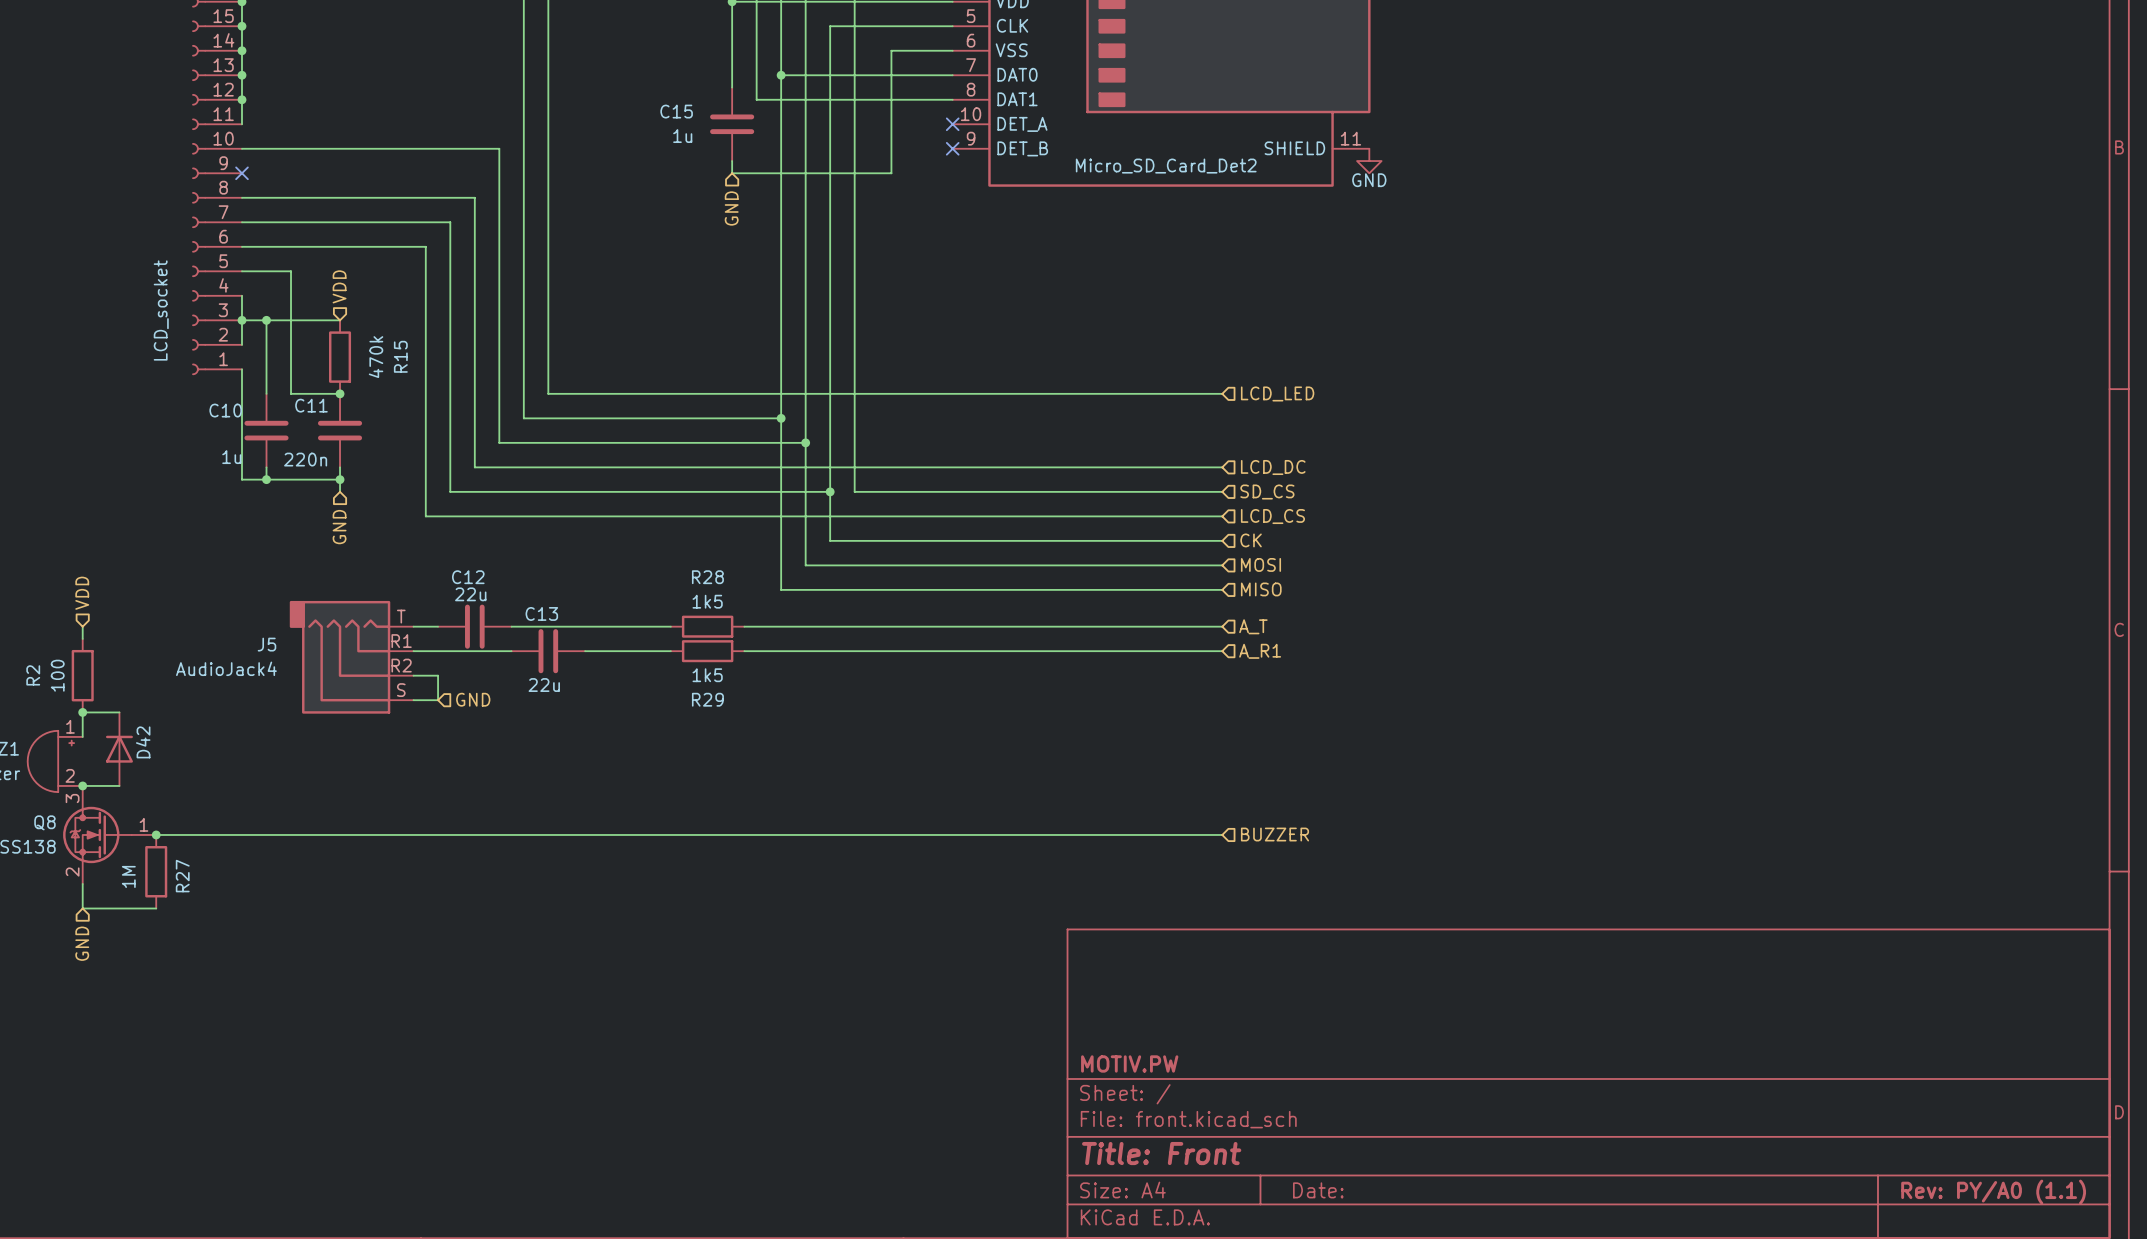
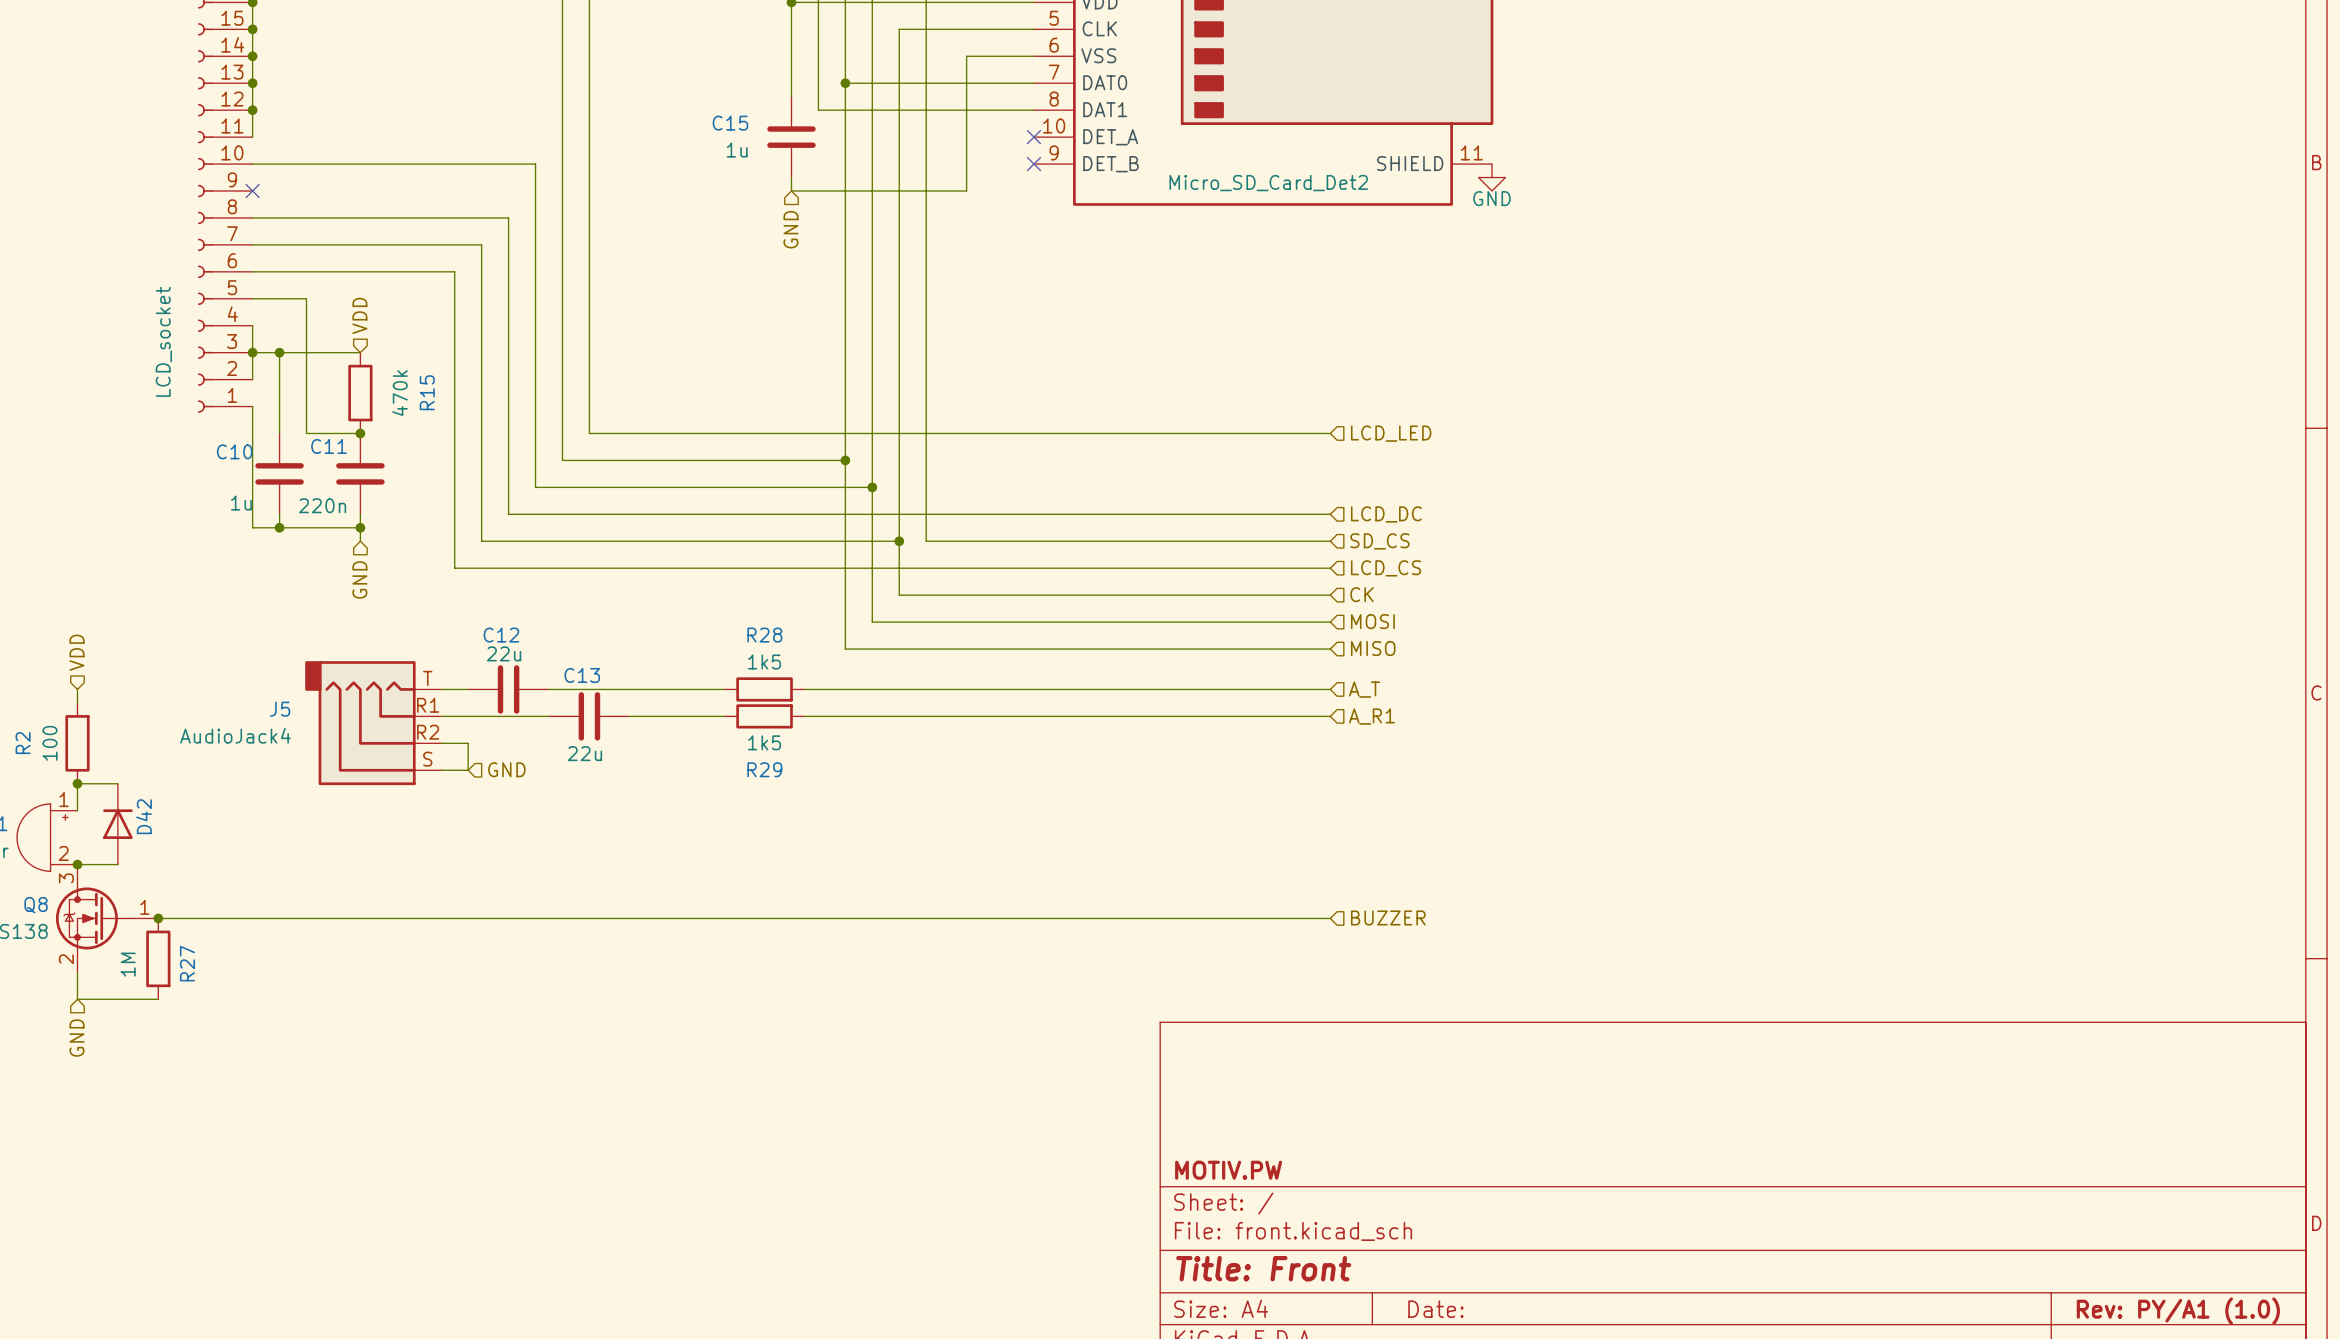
title block: Rev: PY/A0 (1.1) (1993, 1192) -> Rev: PY/A1 (1.0) (2178, 1311)

